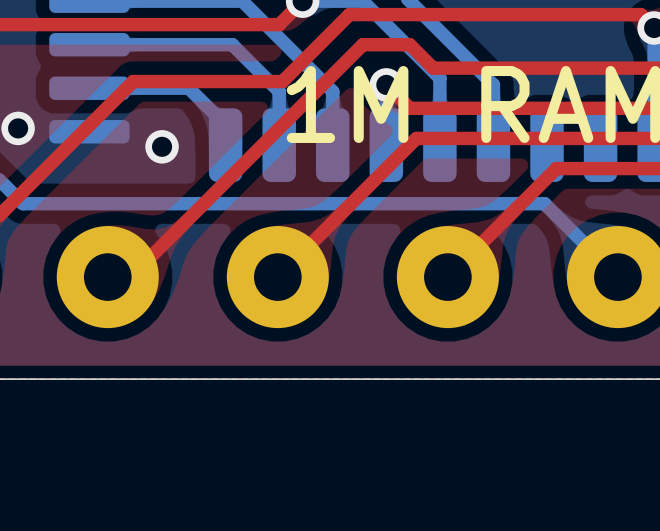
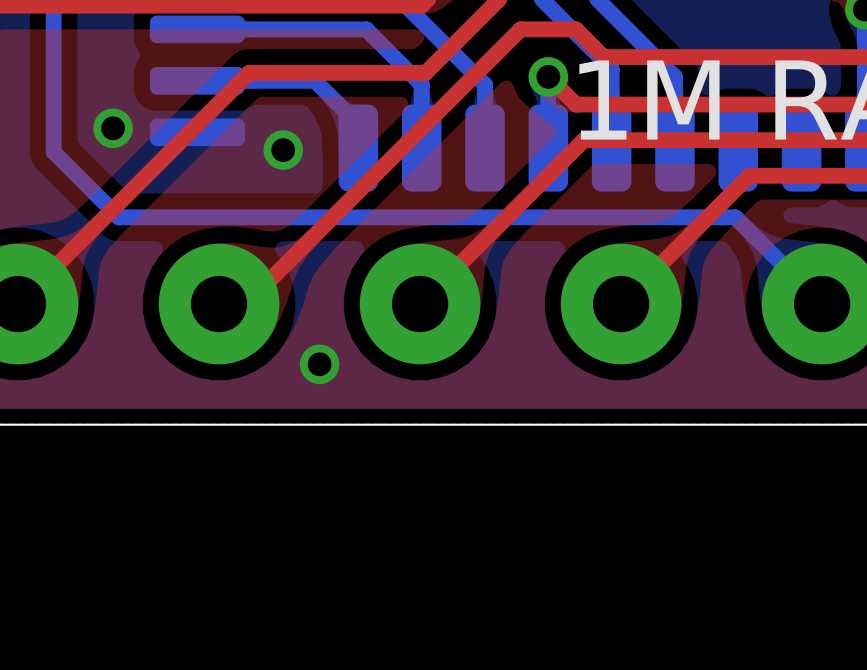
via: none -> (319, 364)

